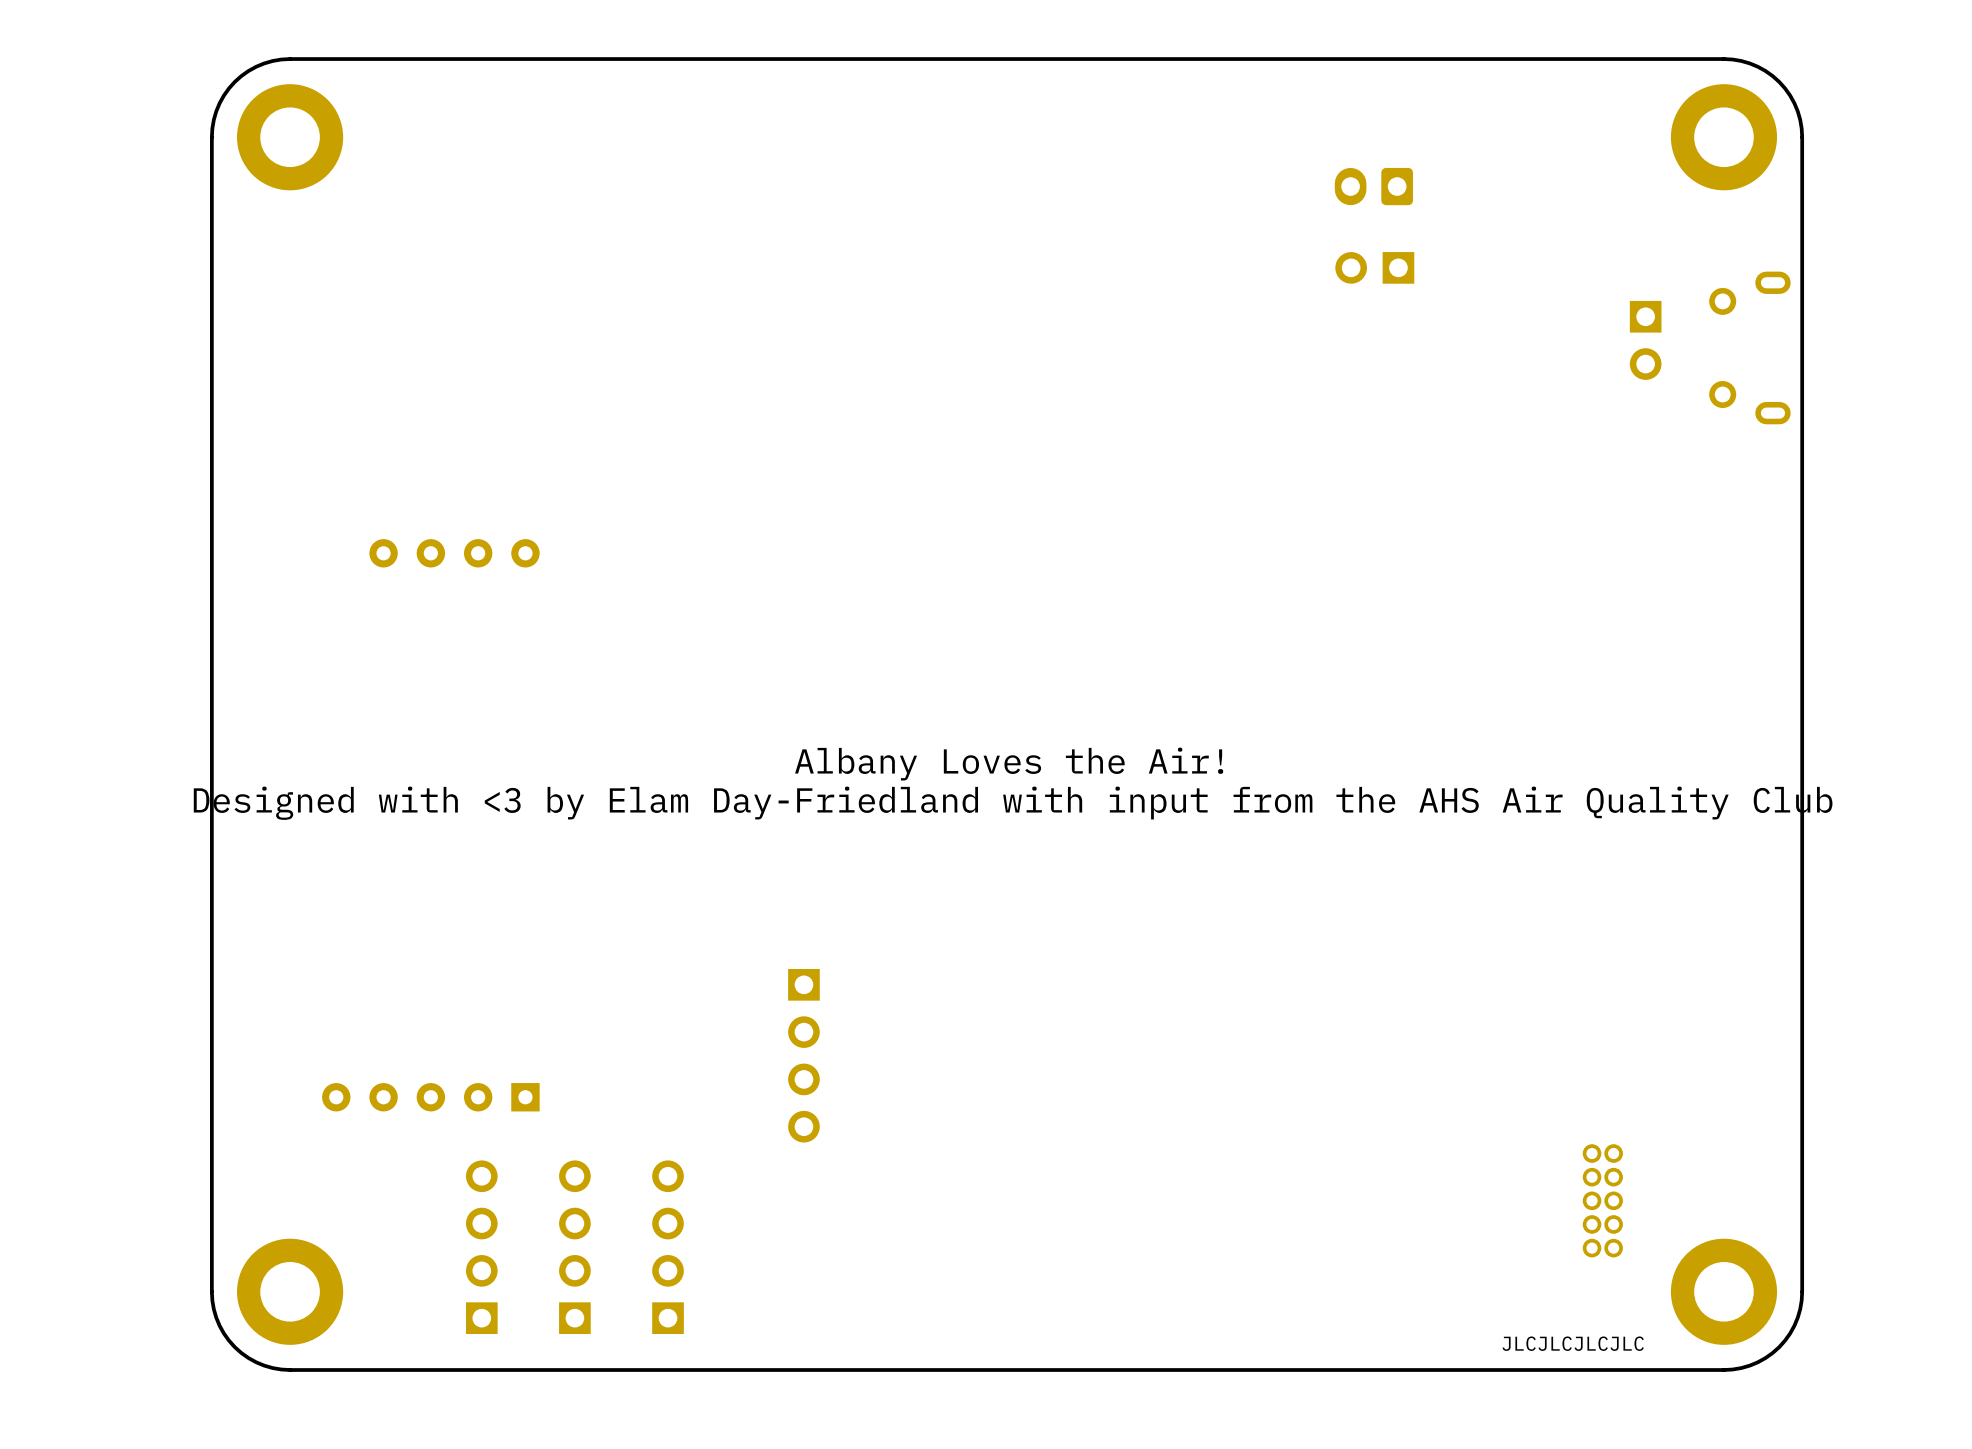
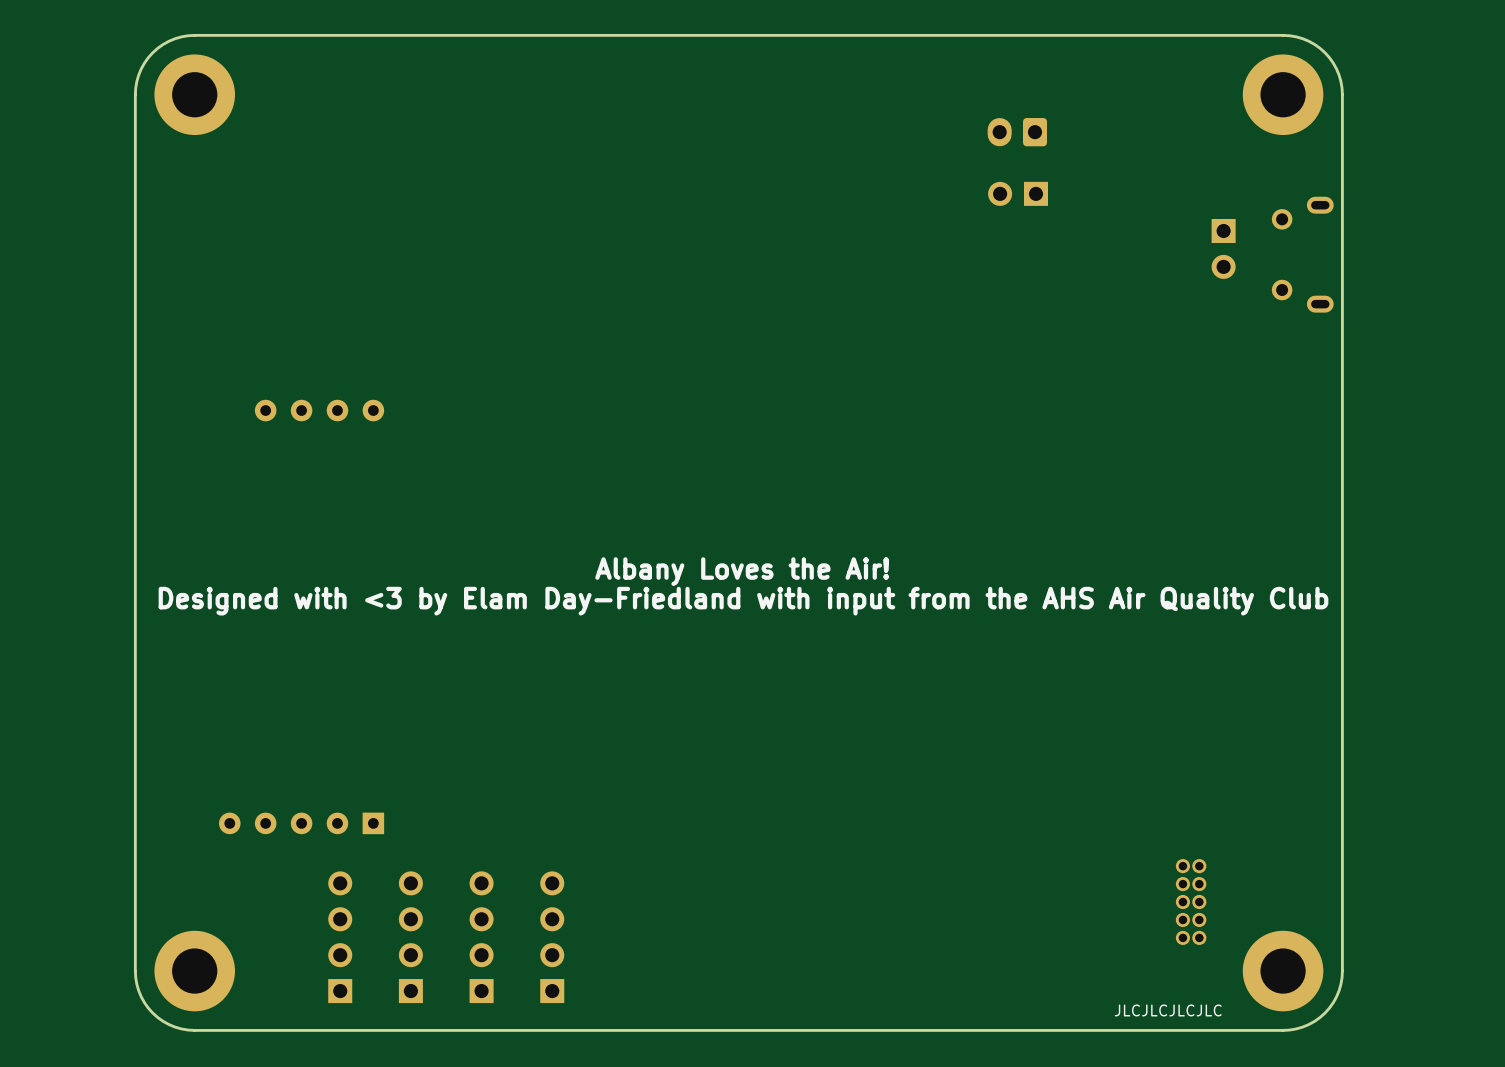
part rotation: 0° (803, 1055) -> 180° (552, 937)
part position: (803, 1055) -> (552, 937)

